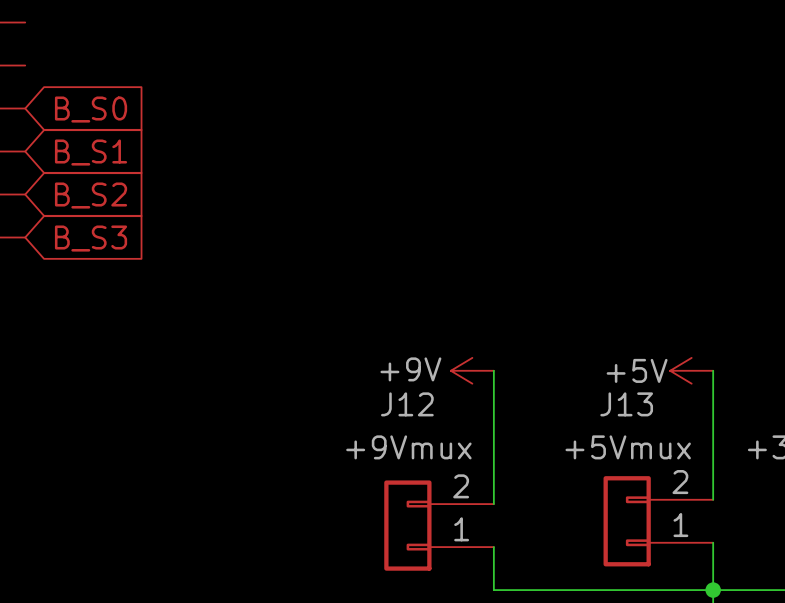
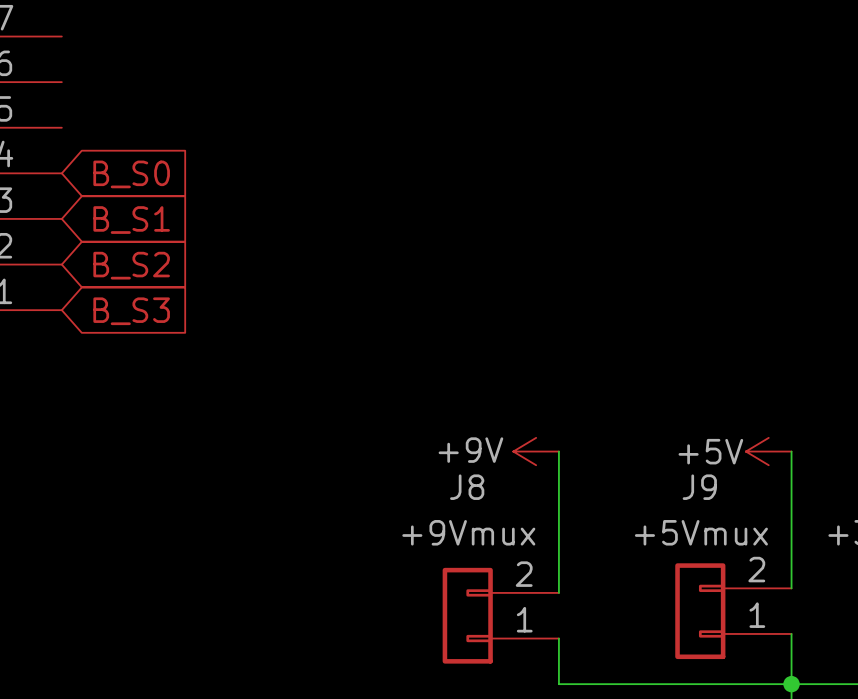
J12 name: J12 (407, 404) -> J8 (467, 487)
J13 name: J13 (626, 404) -> J9 (699, 487)

